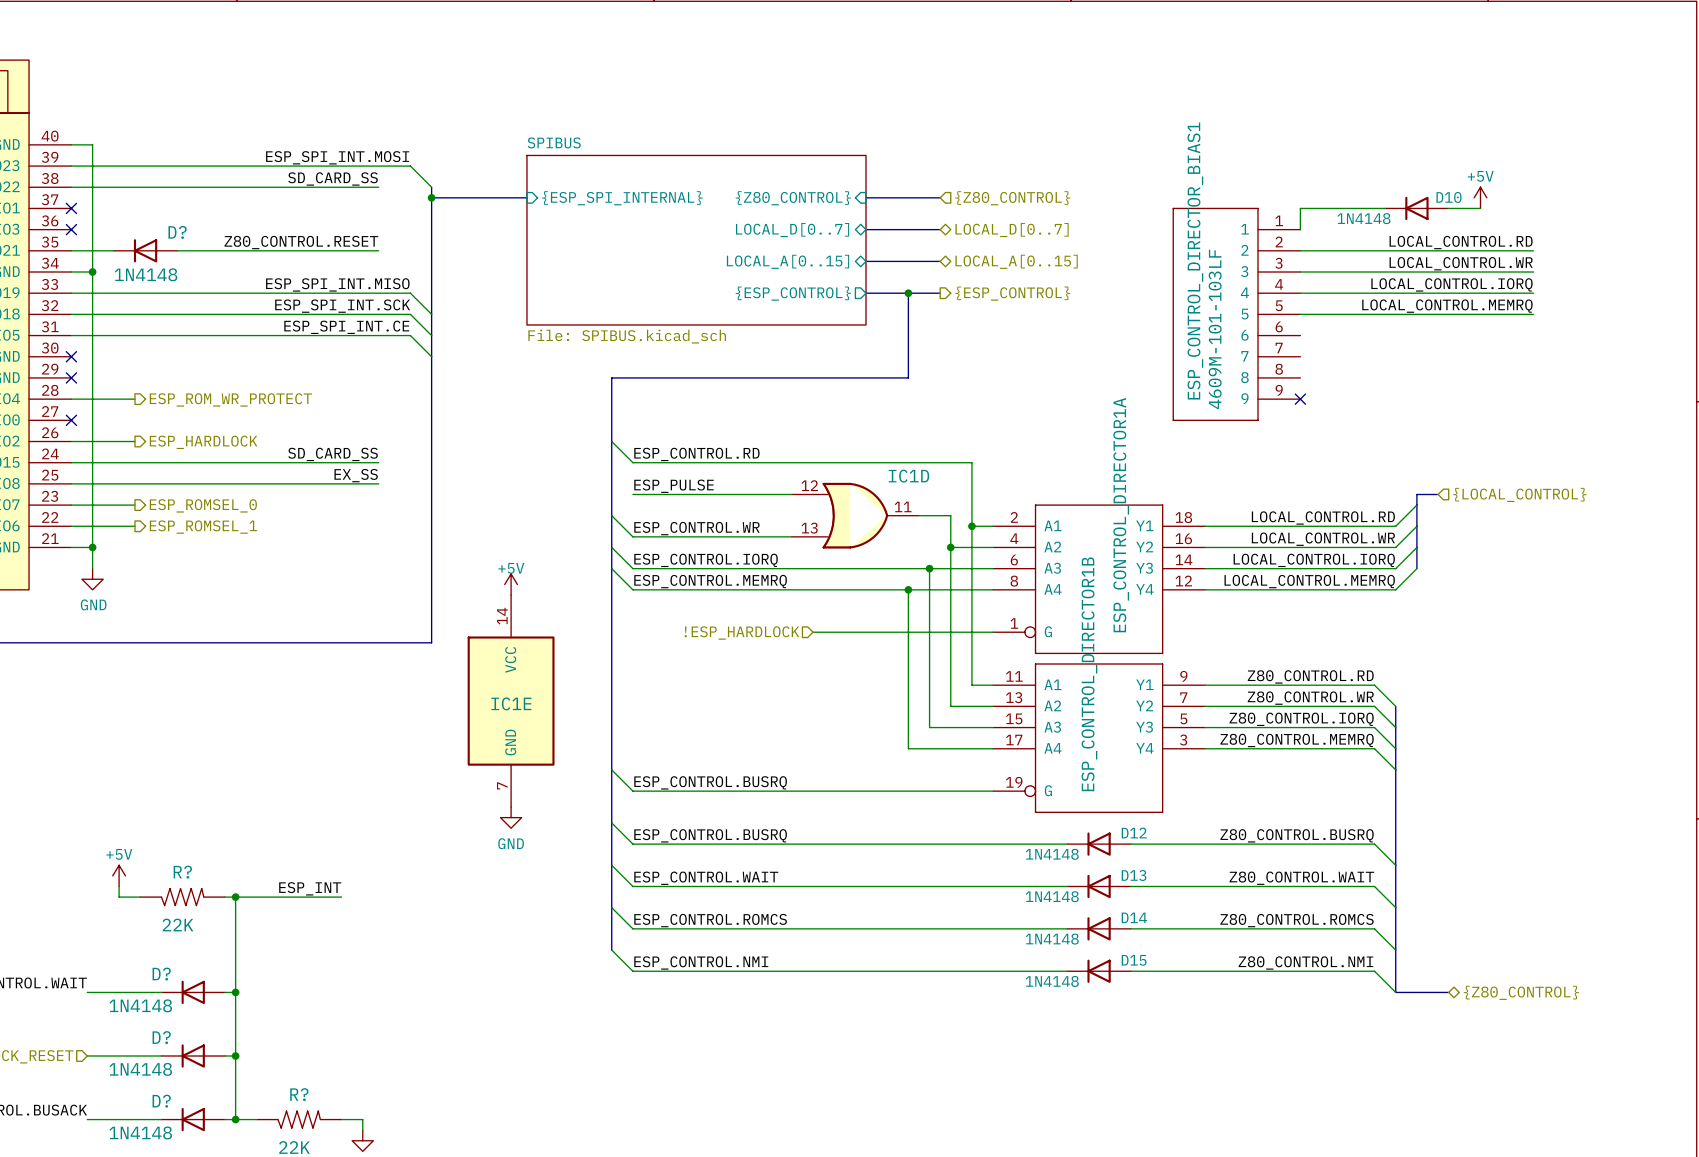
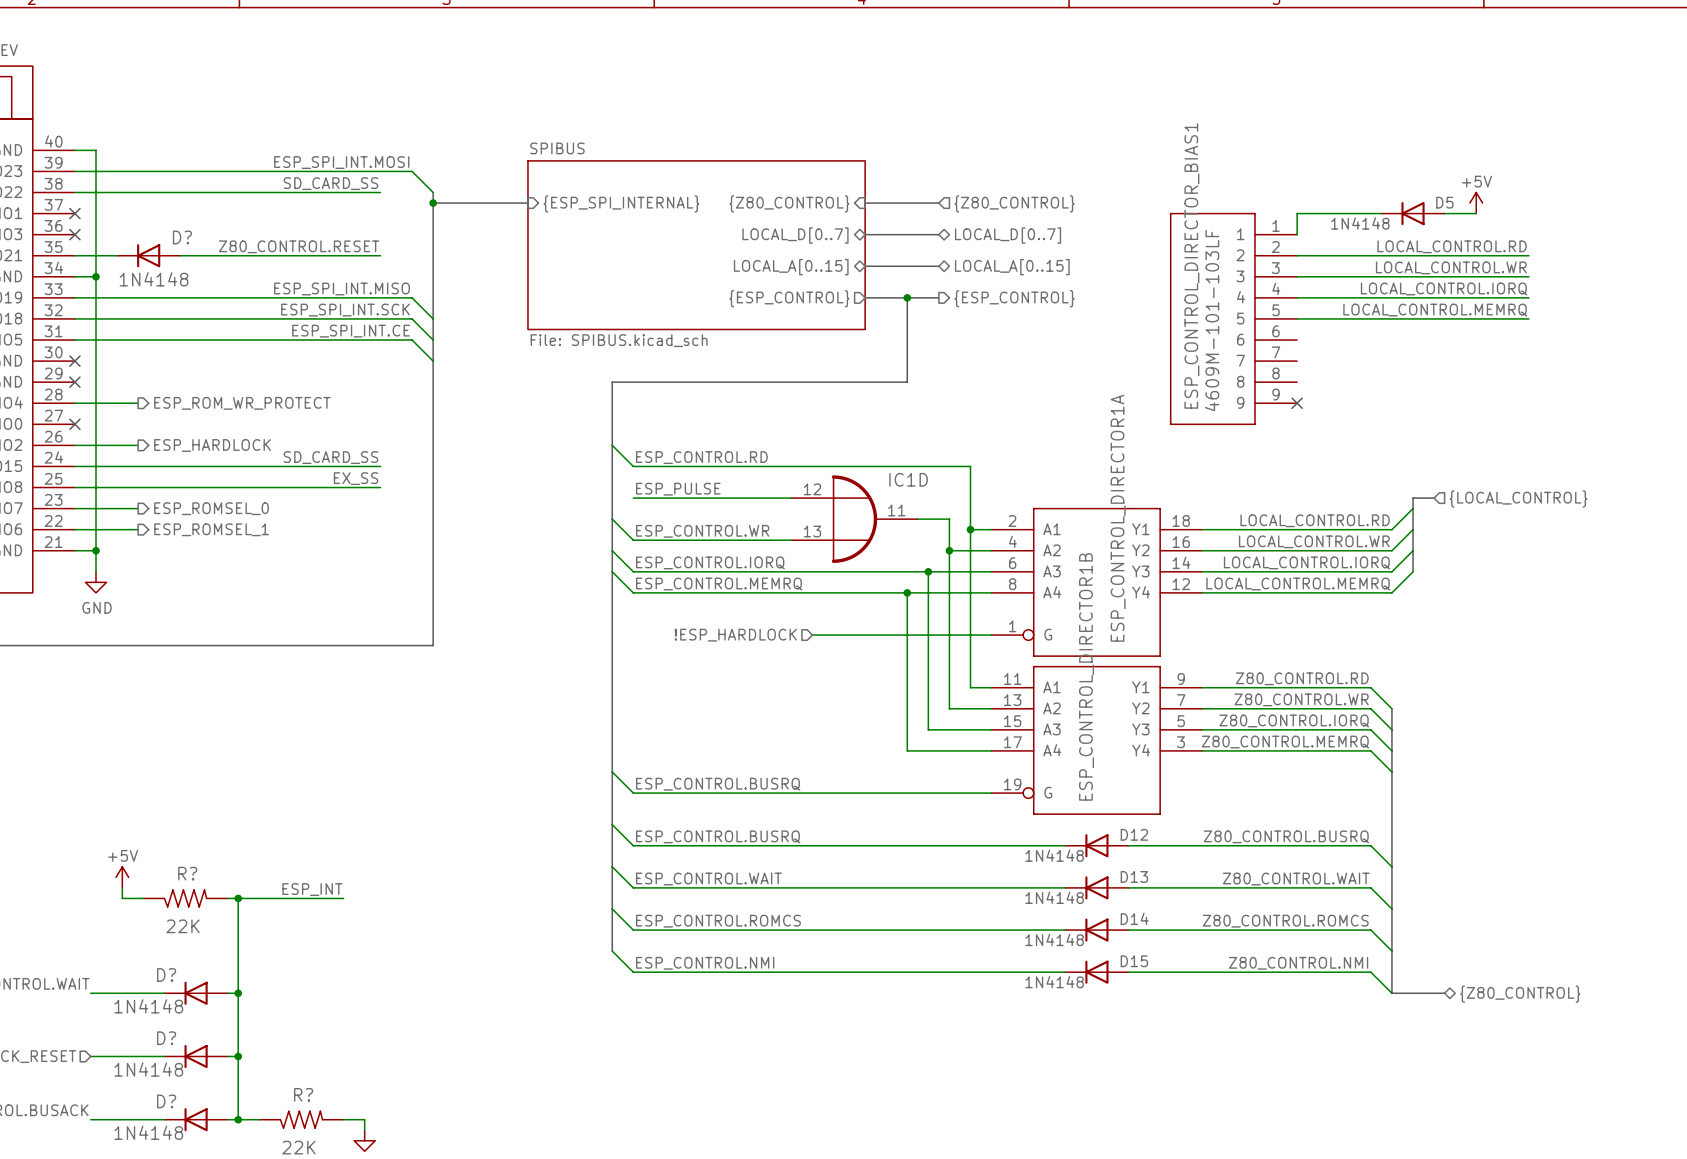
D10 name: D10 (1449, 197) -> D5 (1444, 202)
IC1D symbol: [791, 482, 919, 549] -> [791, 475, 918, 563]
power symbol: +5V (511, 584) -> none
IC1E: (511, 701) -> none
power symbol: GND (511, 817) -> none

